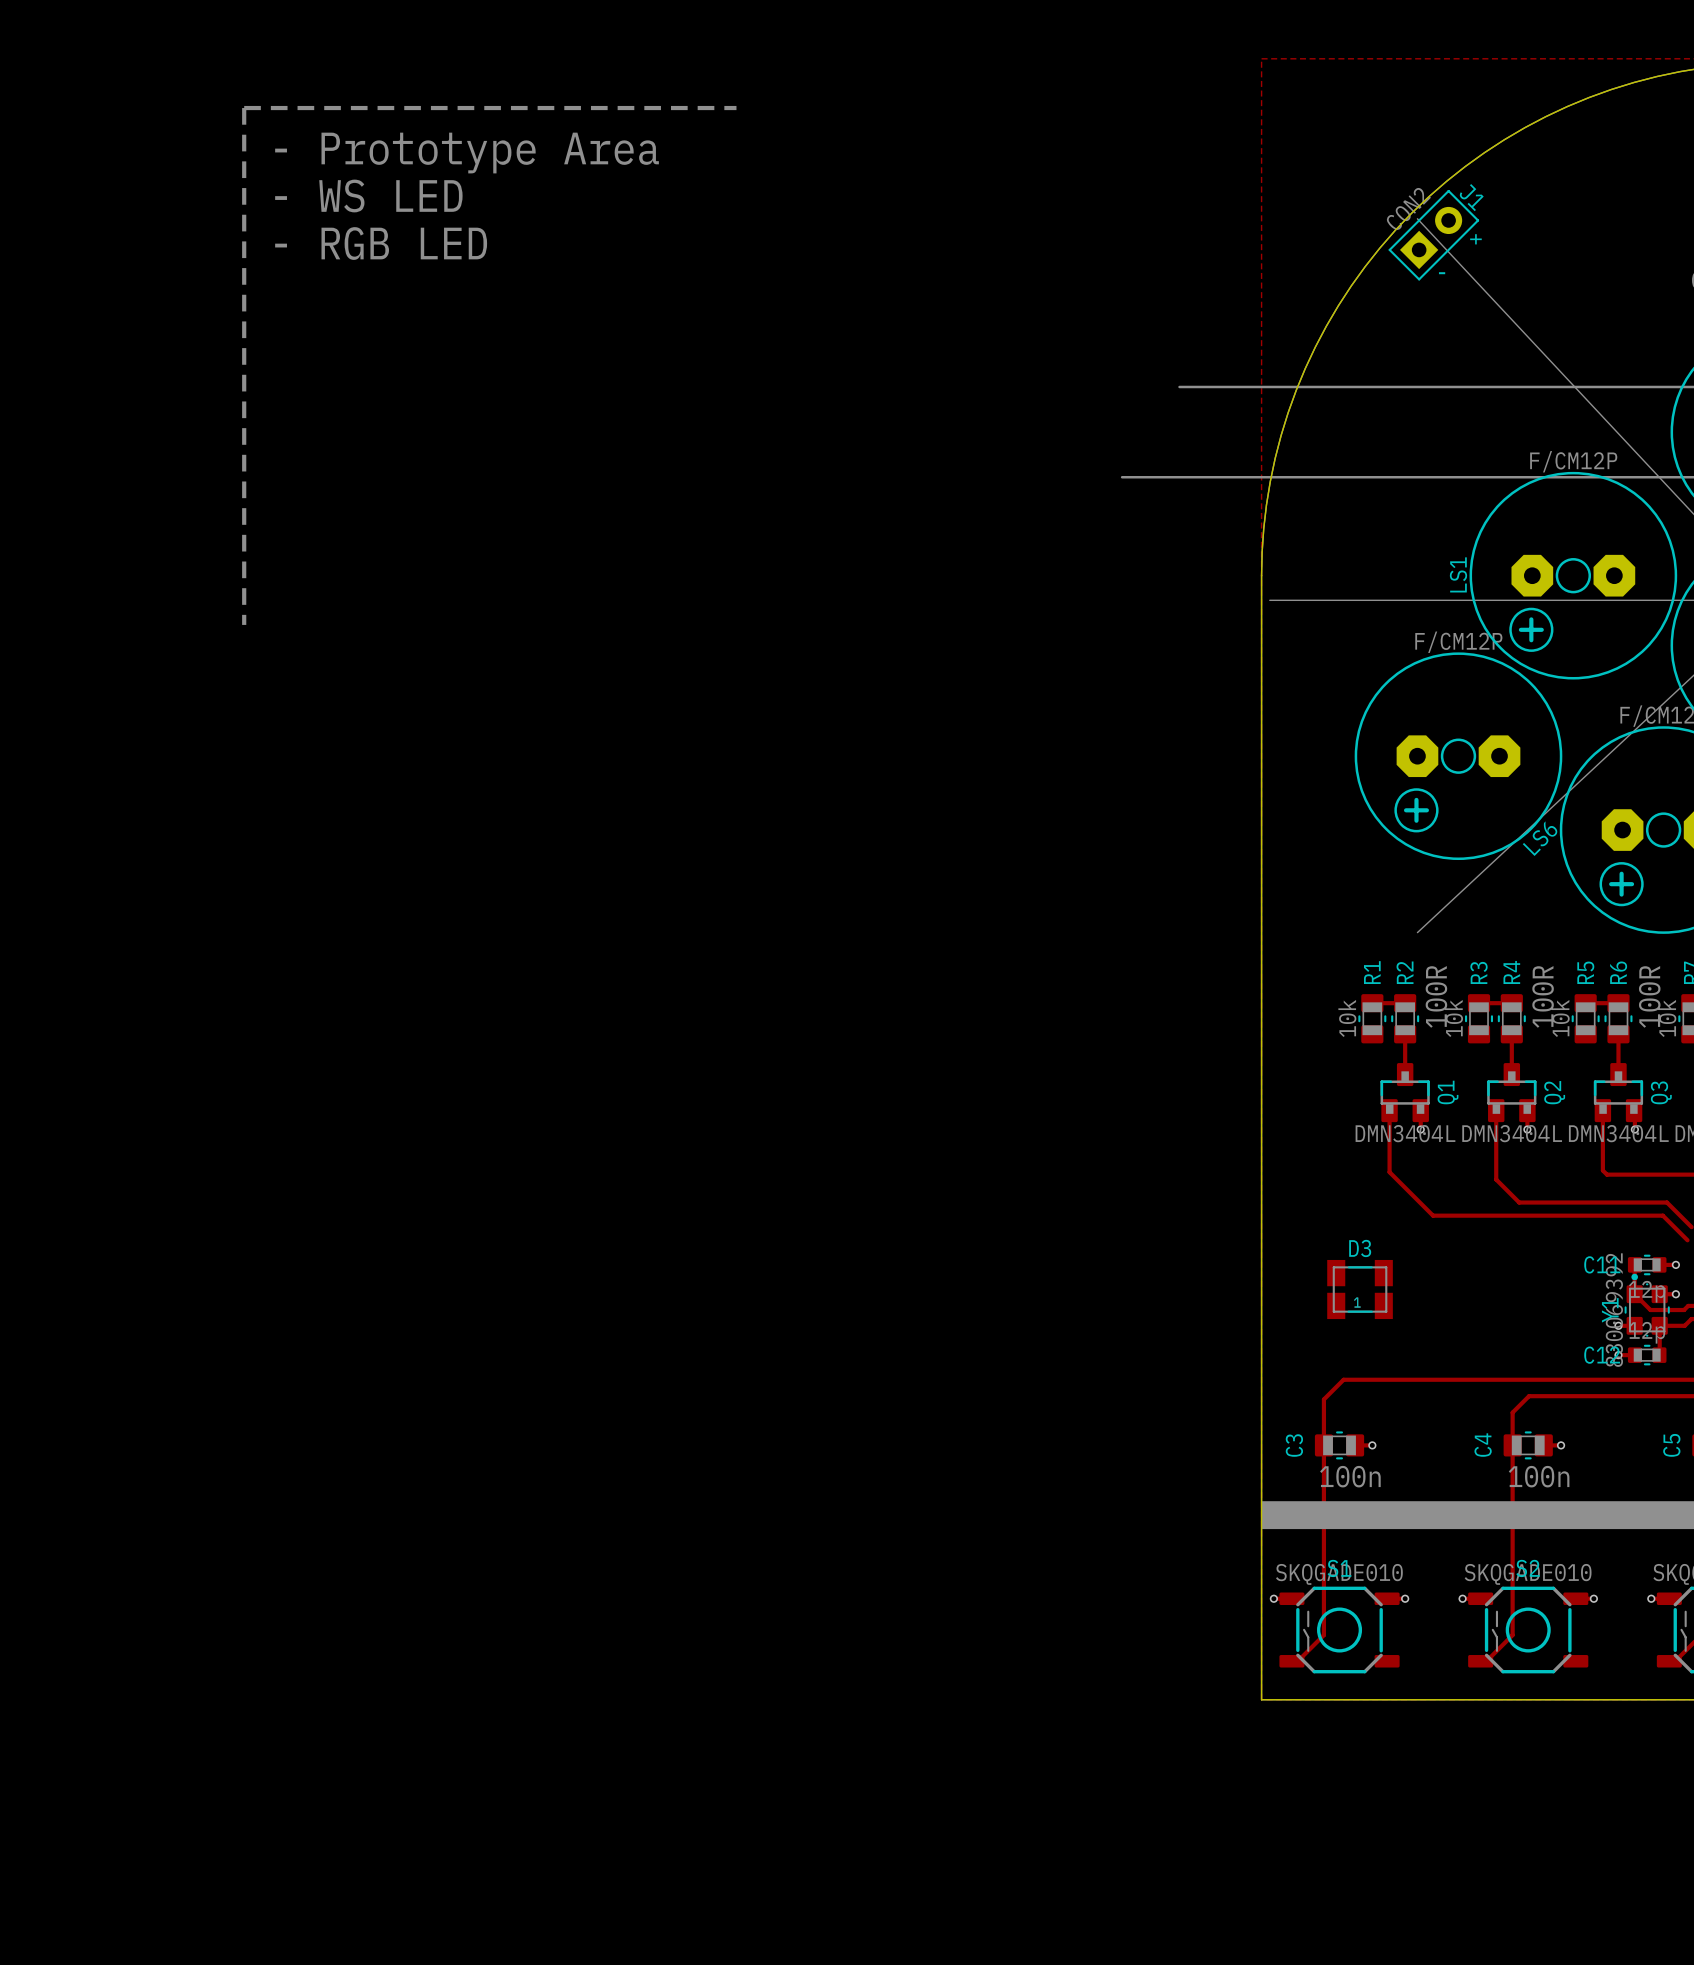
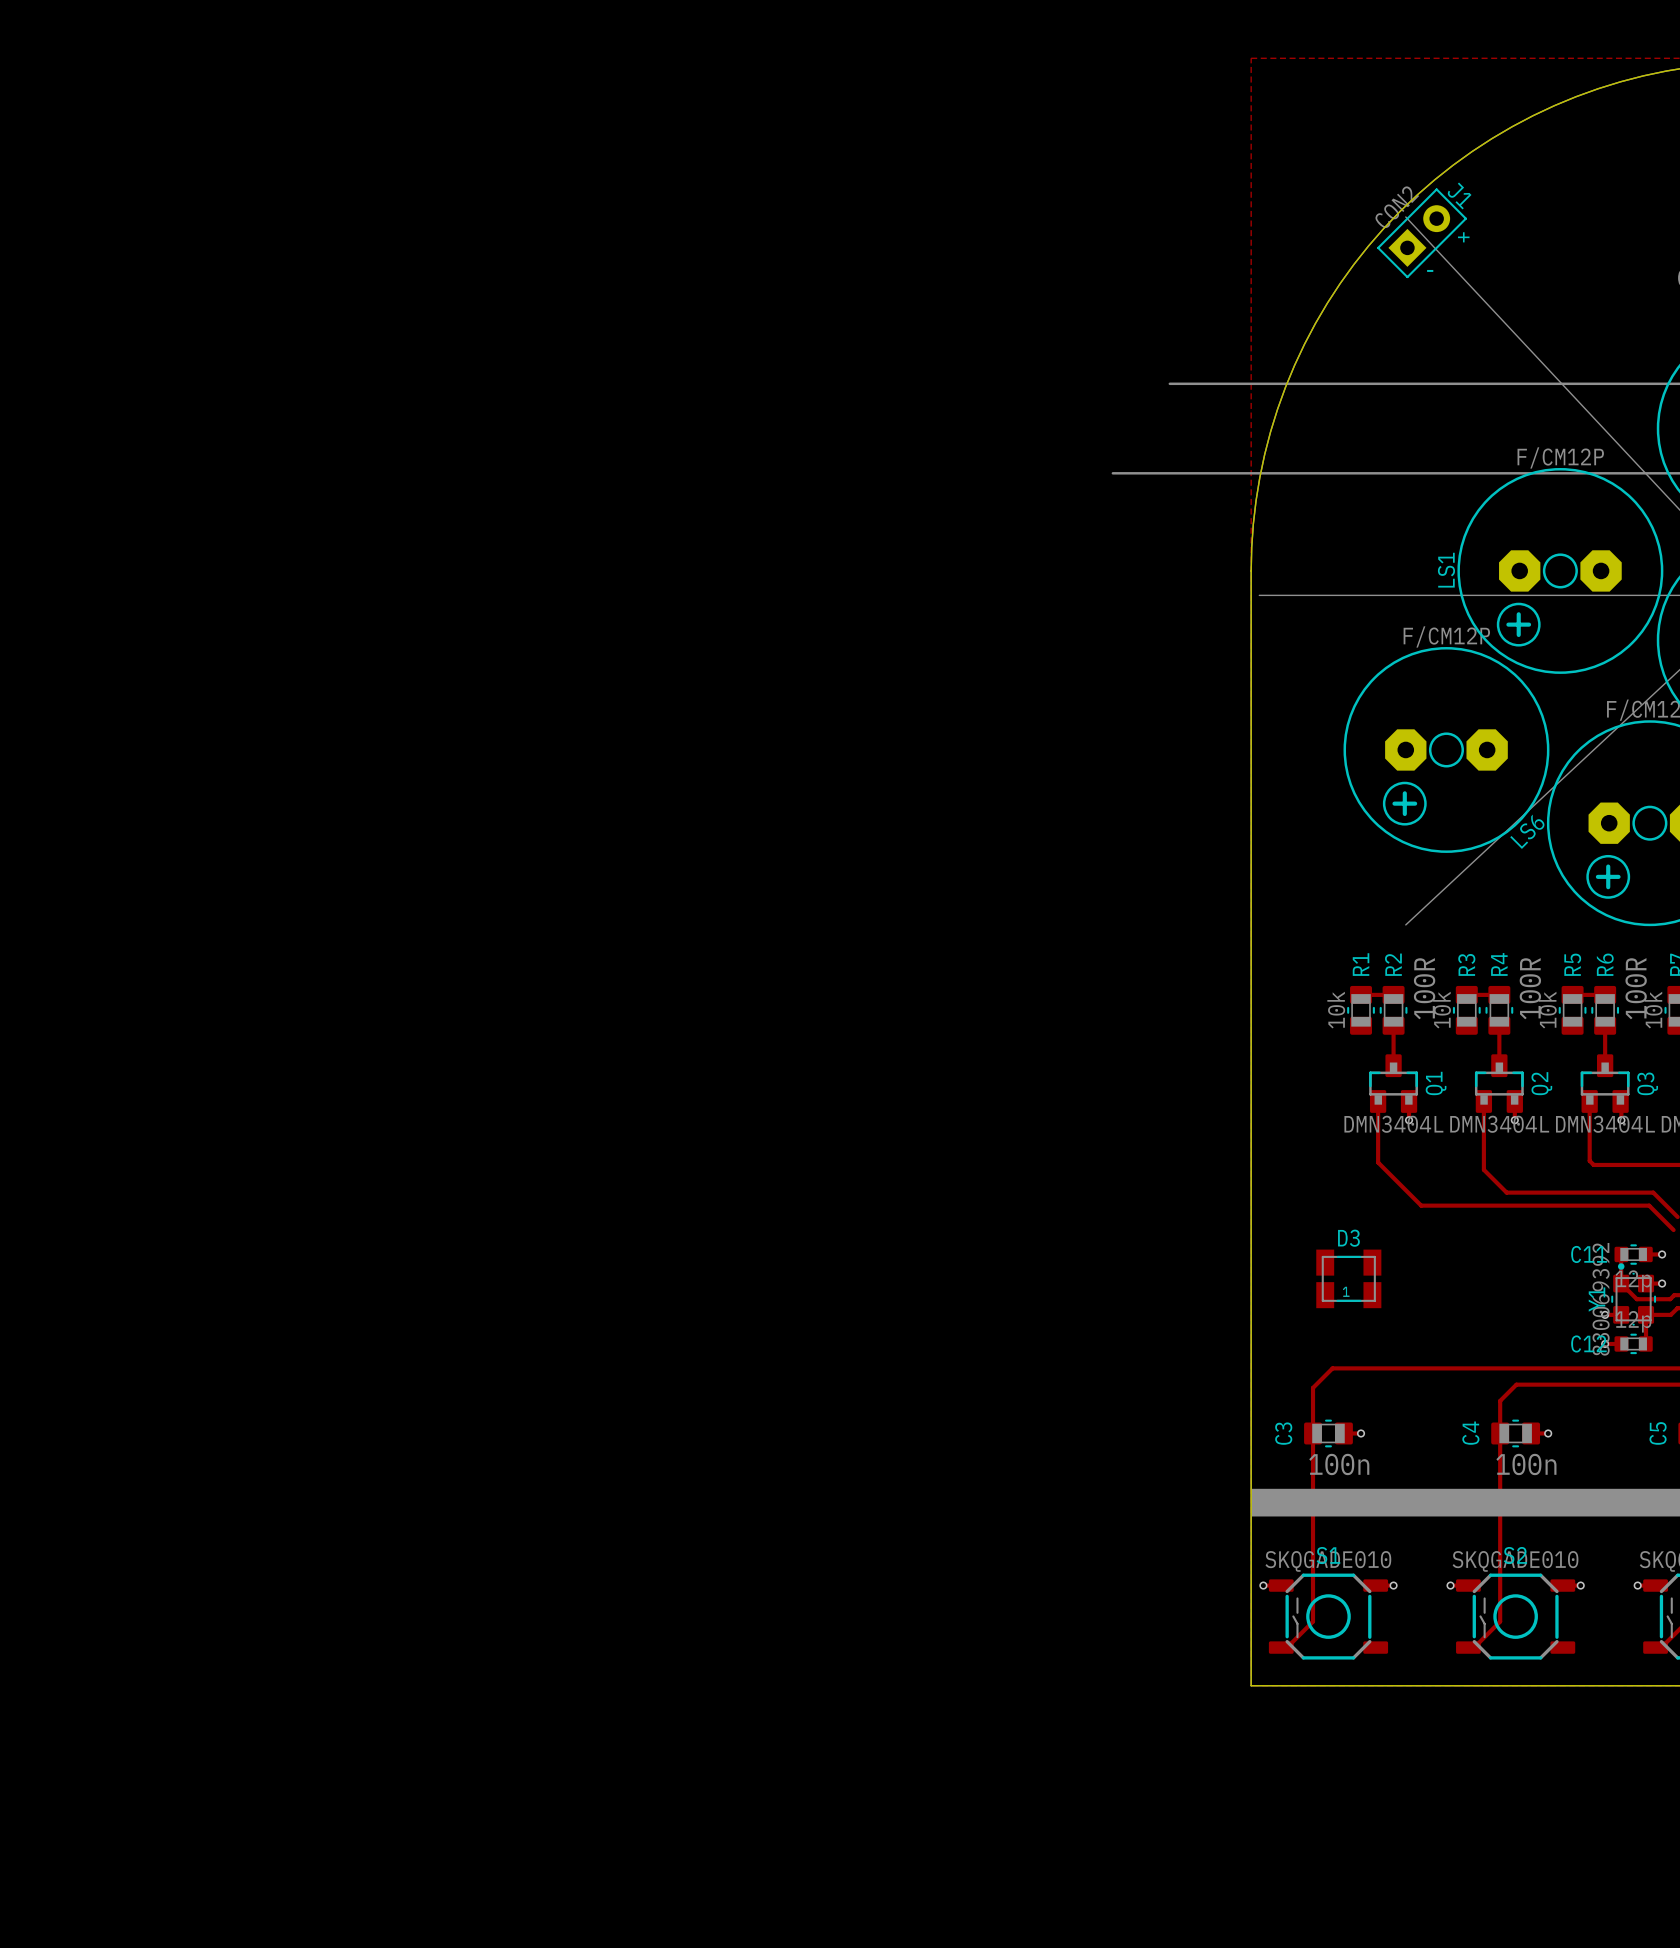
line: (736, 108) (244, 108) (244, 624) -> none
text: - Prototype Area (467, 153) -> none
text: - WS LED (368, 196) -> none
text: - RGB LED (381, 243) -> none

